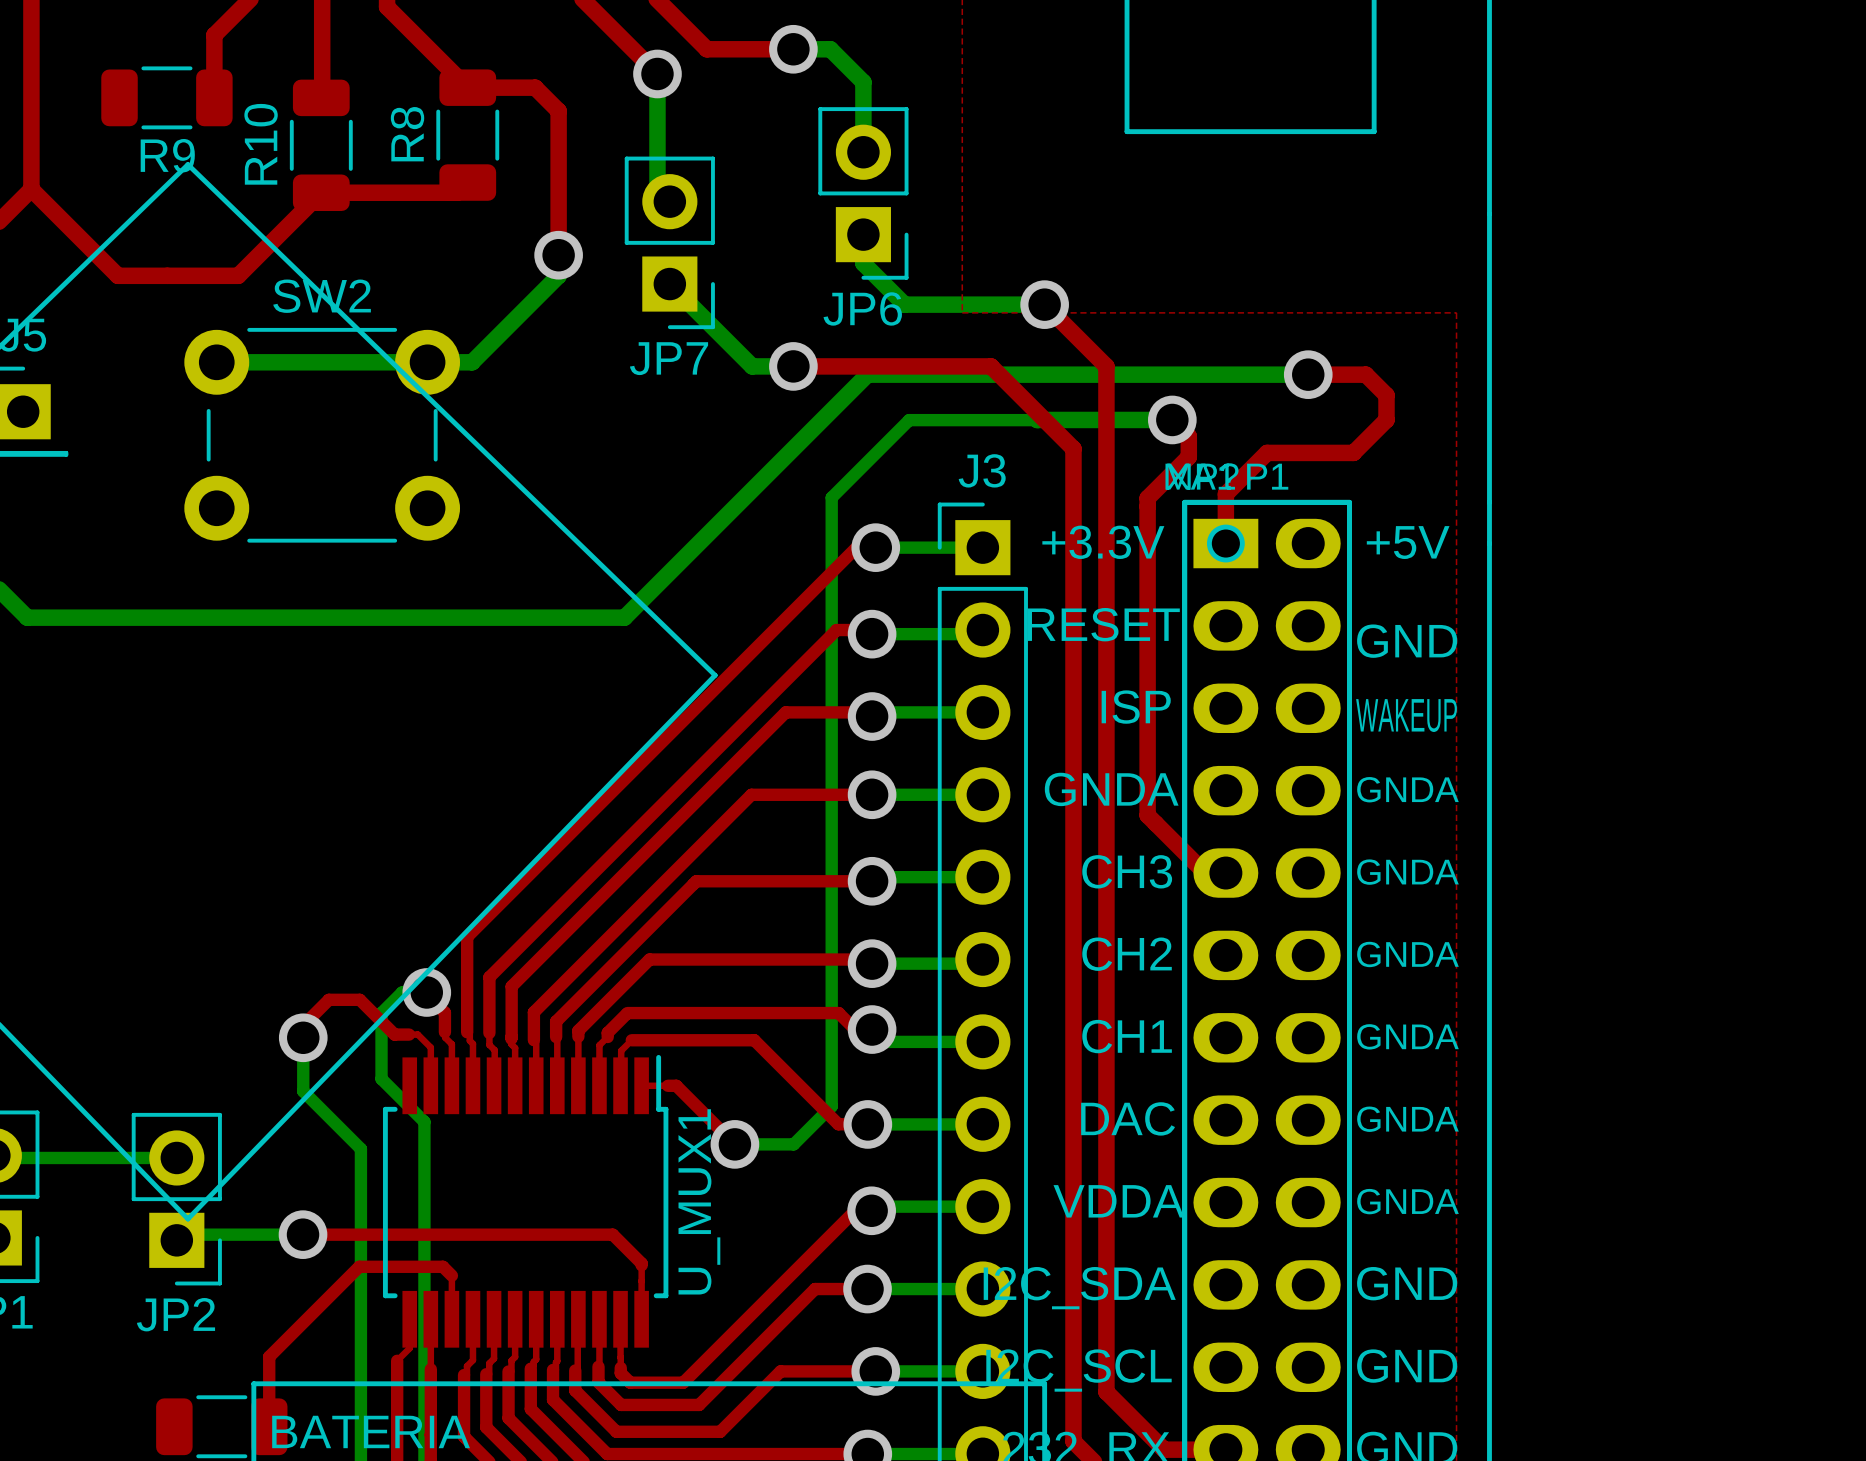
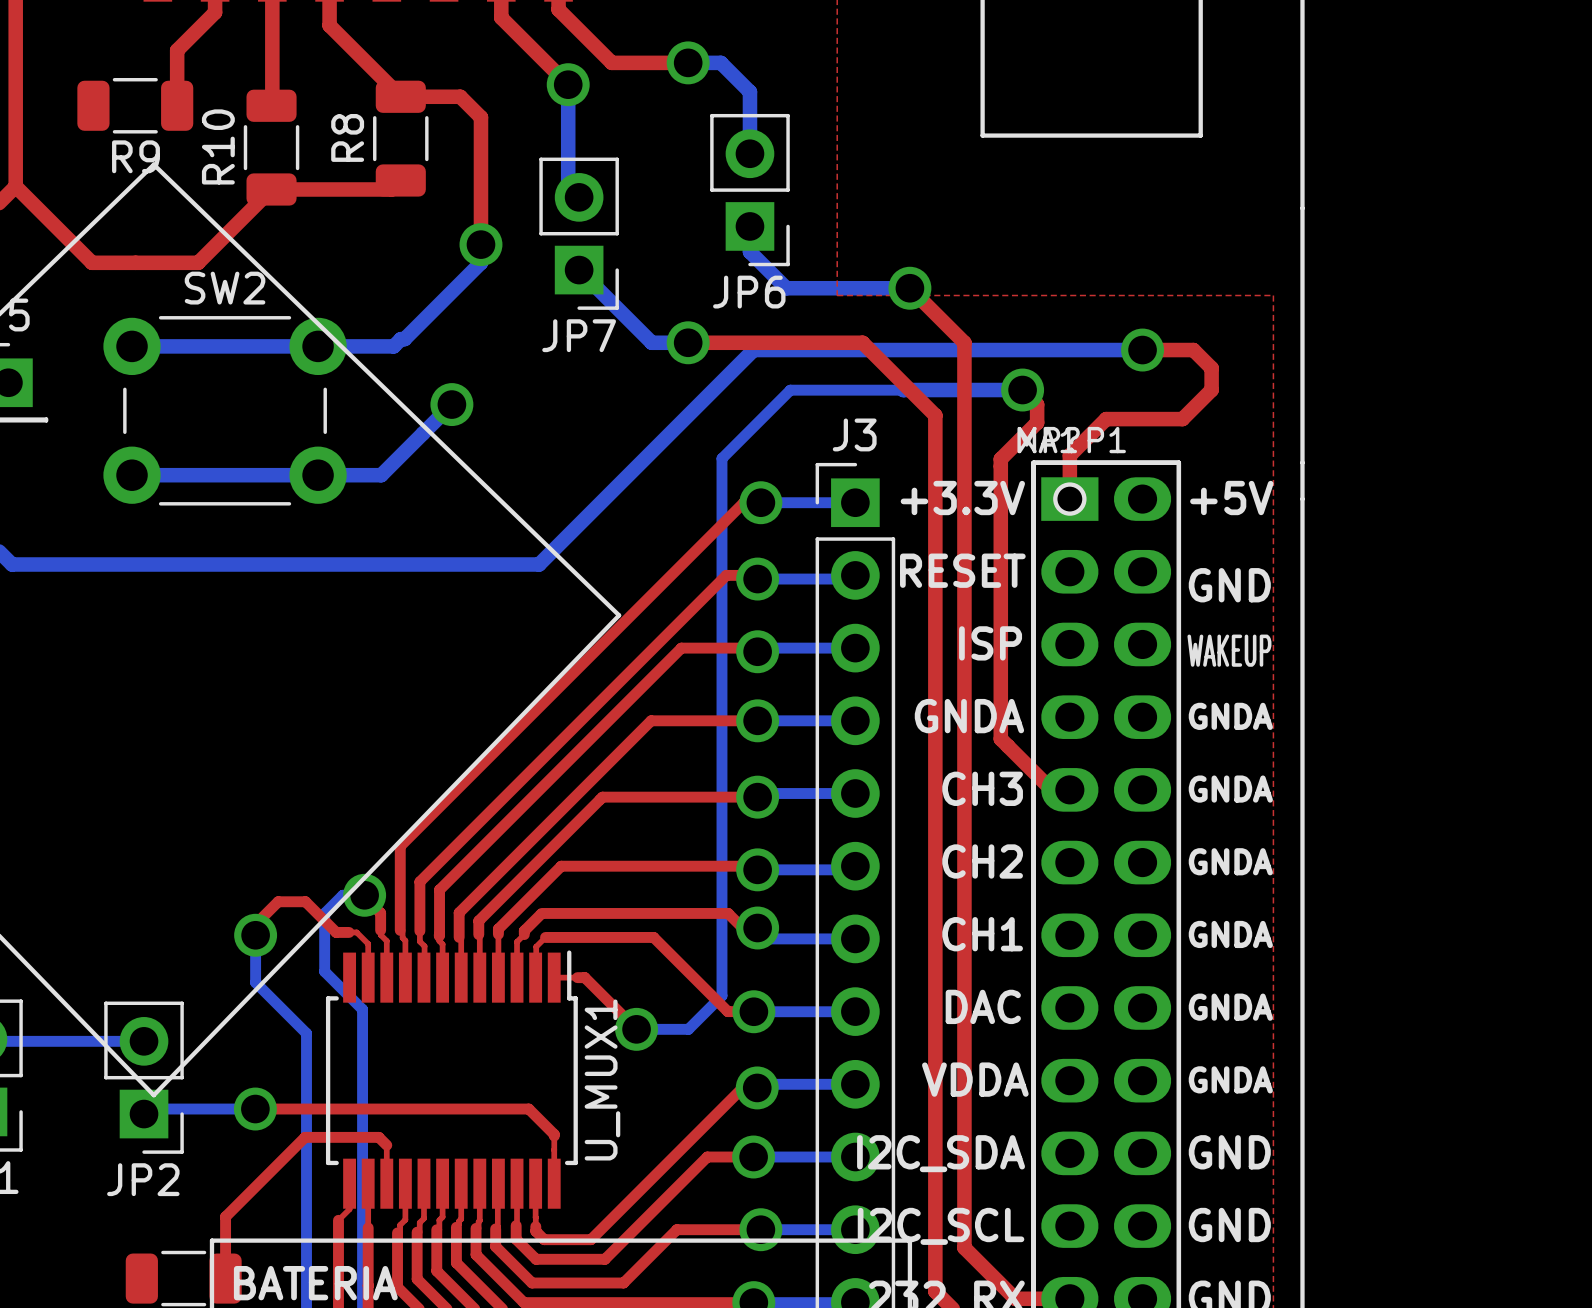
bottom track: (216, 362) (468, 362) -> (132, 346) (393, 346) (401, 339)
SW2 position: (322, 435) -> (225, 410)
bottom track: none -> (451, 404) (381, 475) (132, 475)
via: none -> (451, 404)

